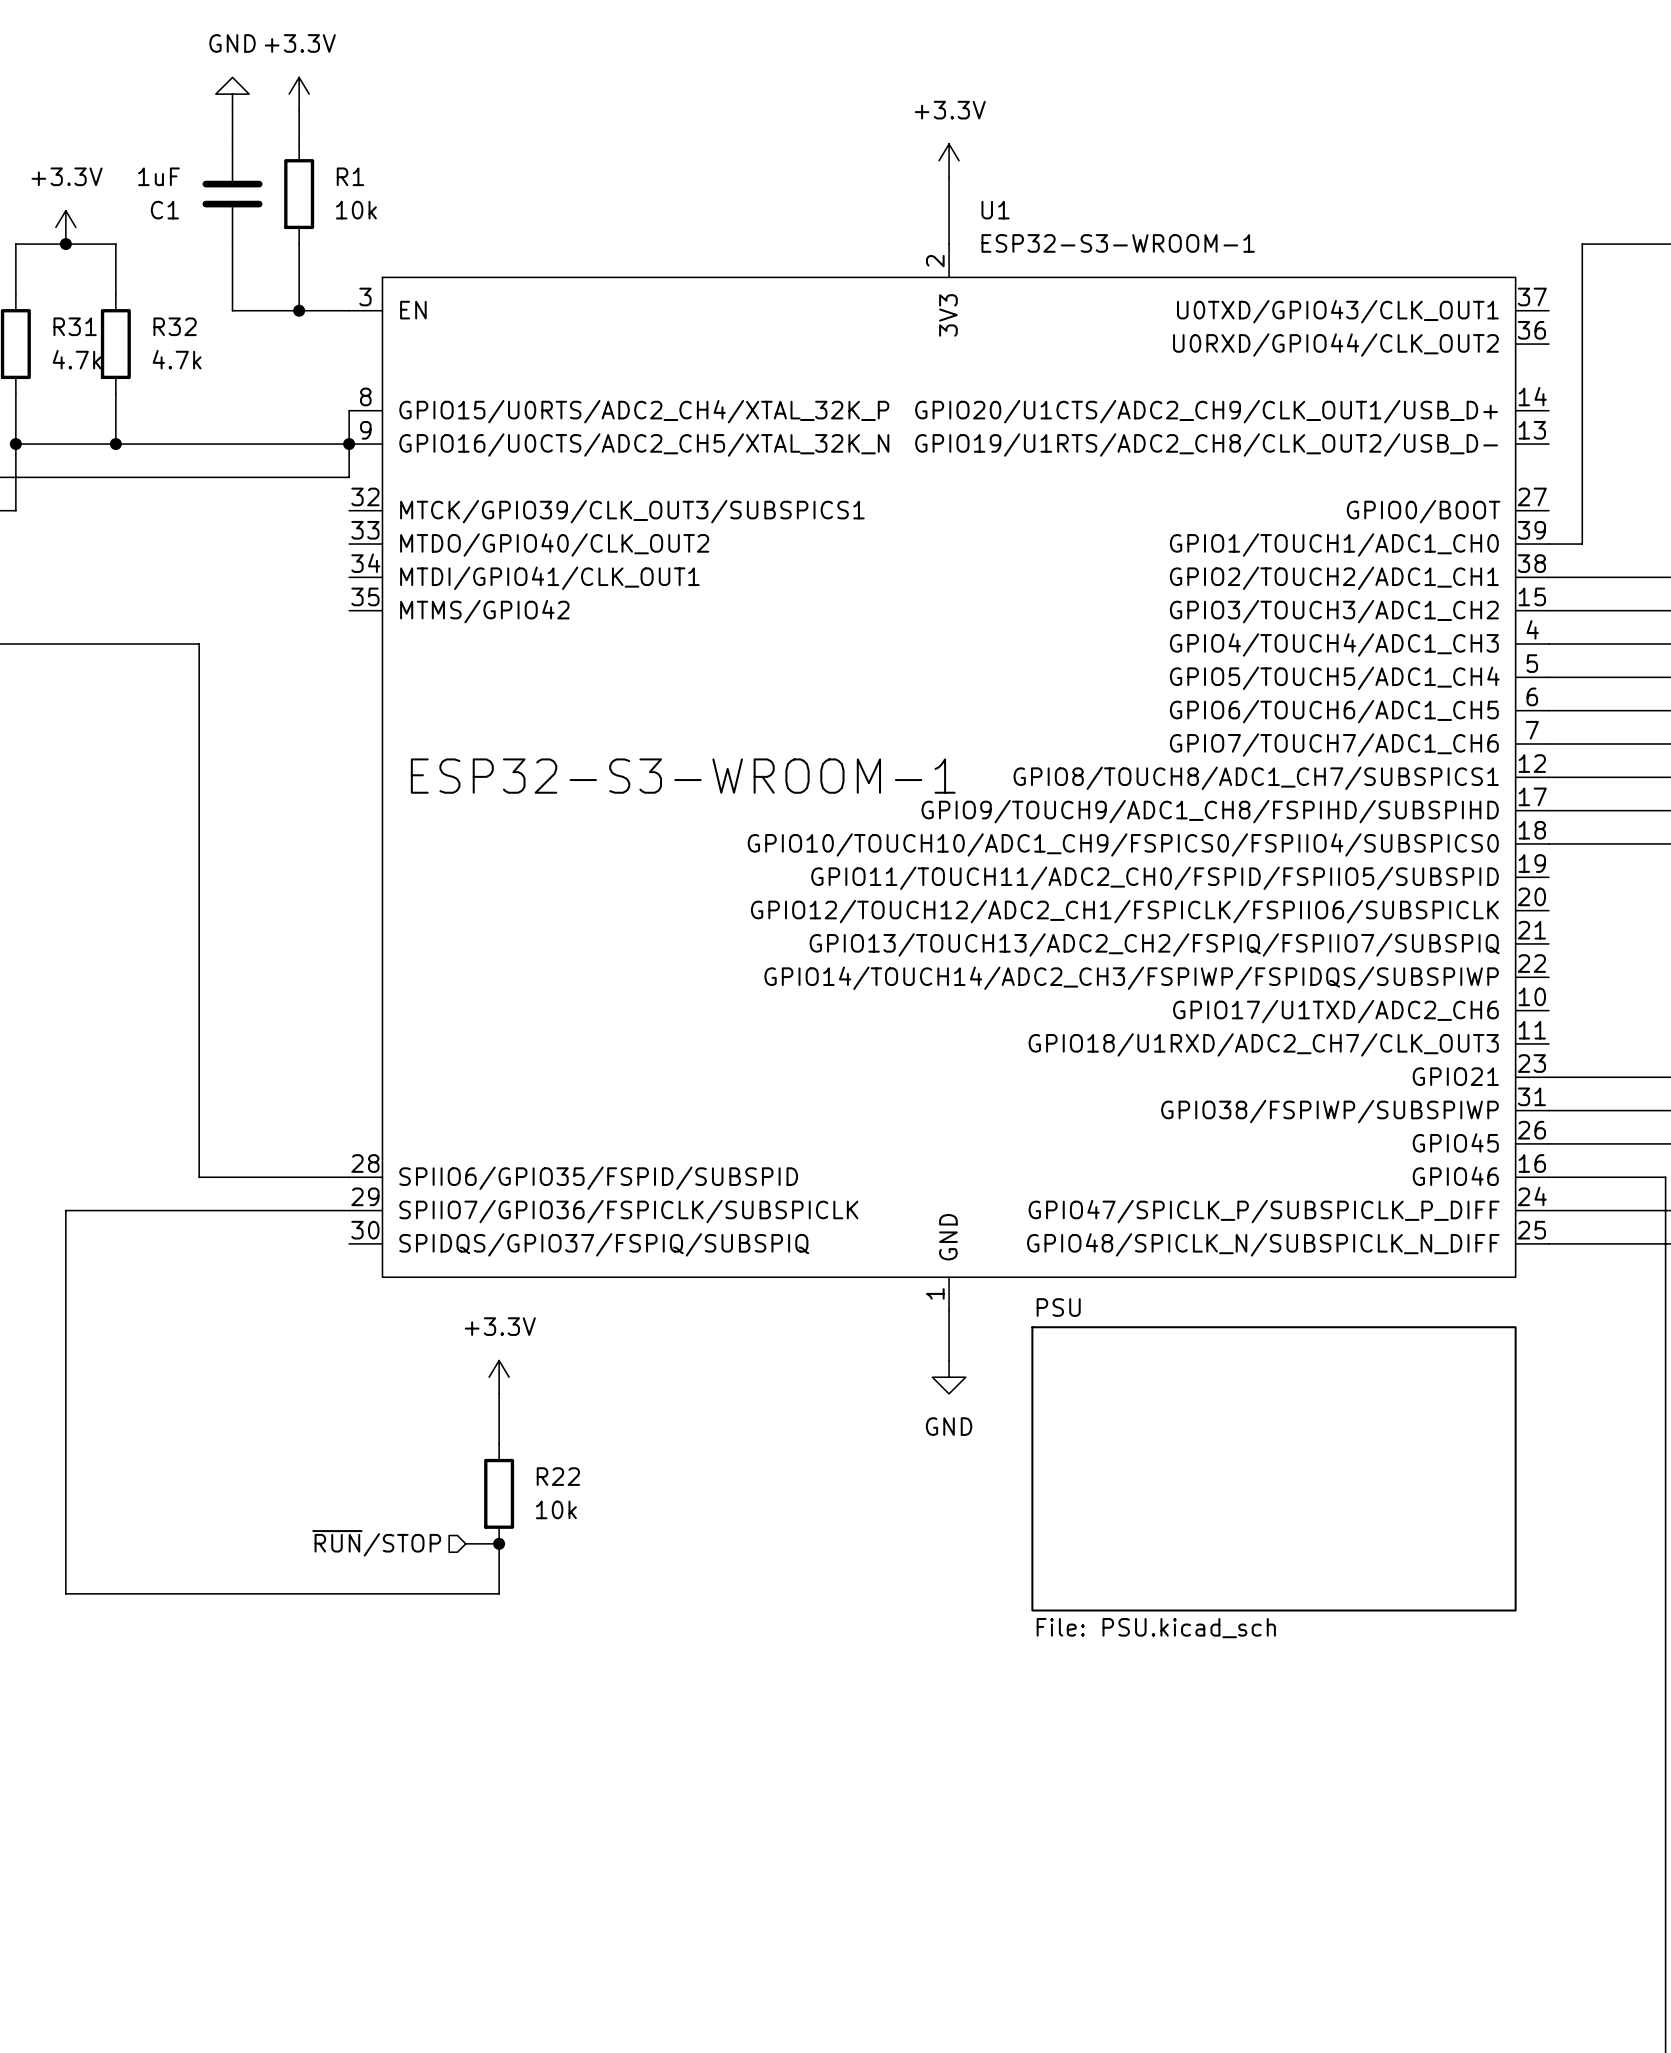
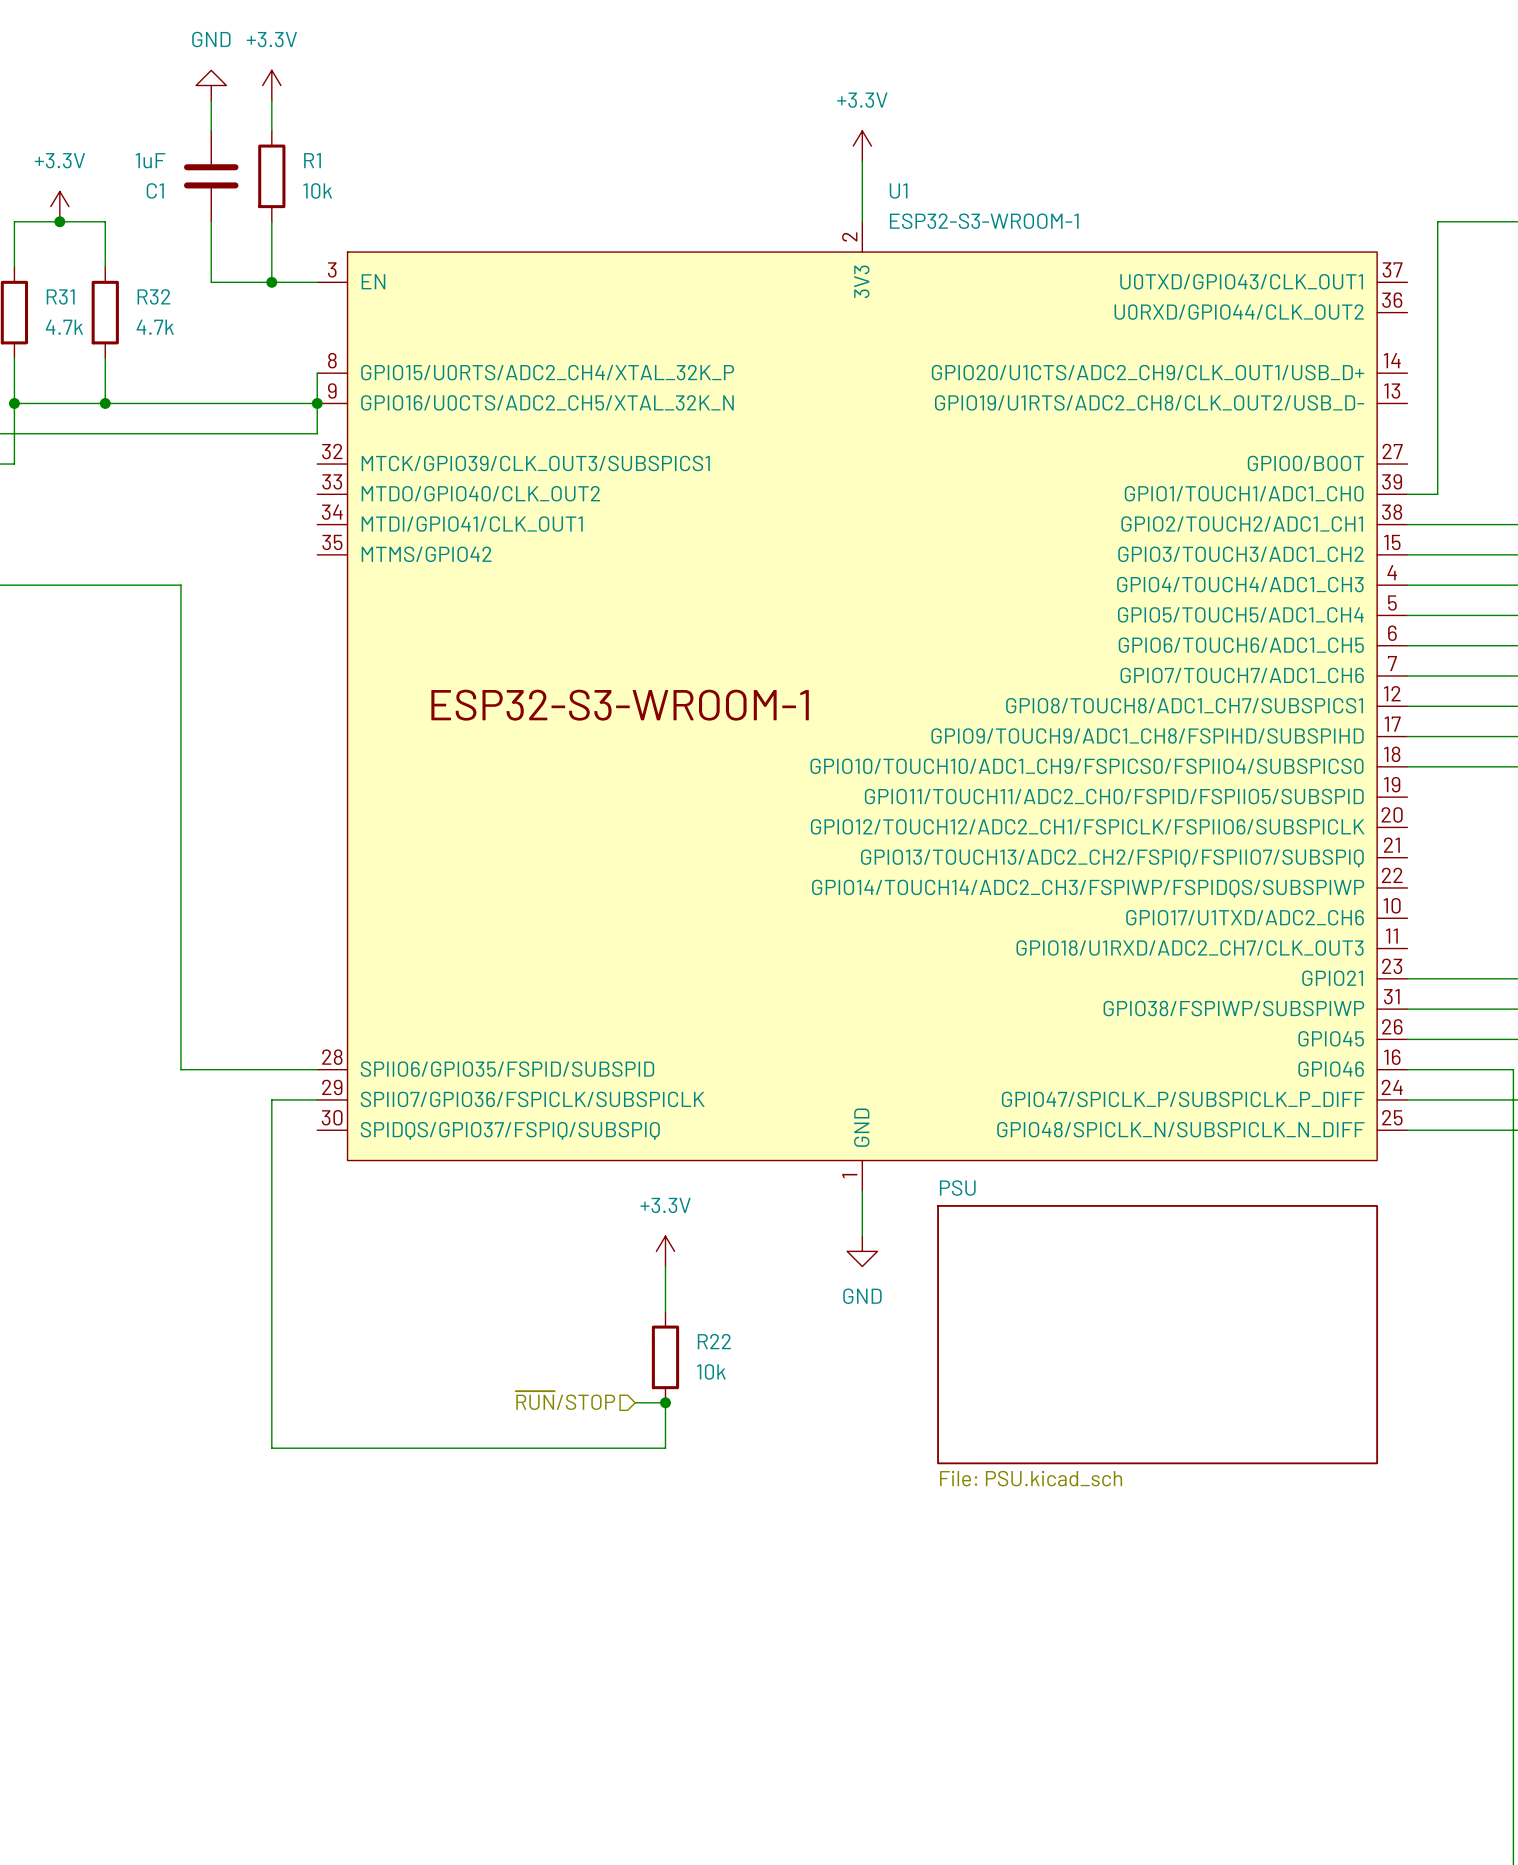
wire: (299, 1210) (65, 1210) (65, 1593) (299, 1593) -> (271, 1099) (271, 1448)
power symbol position: +3.3V (499, 1377) -> +3.3V (665, 1251)
wire: (499, 1393) (499, 1443) -> (665, 1266) (665, 1311)
R22 position: (499, 1493) -> (665, 1357)
hierarchical label position: ~{RUN}/STOP (376, 1543) -> ~{RUN}/STOP (565, 1400)
wire: (465, 1543) (499, 1543) (499, 1593) -> (635, 1402) (665, 1402) (665, 1448) (453, 1448)
junction: (499, 1543) -> none
junction: none -> (665, 1402)

